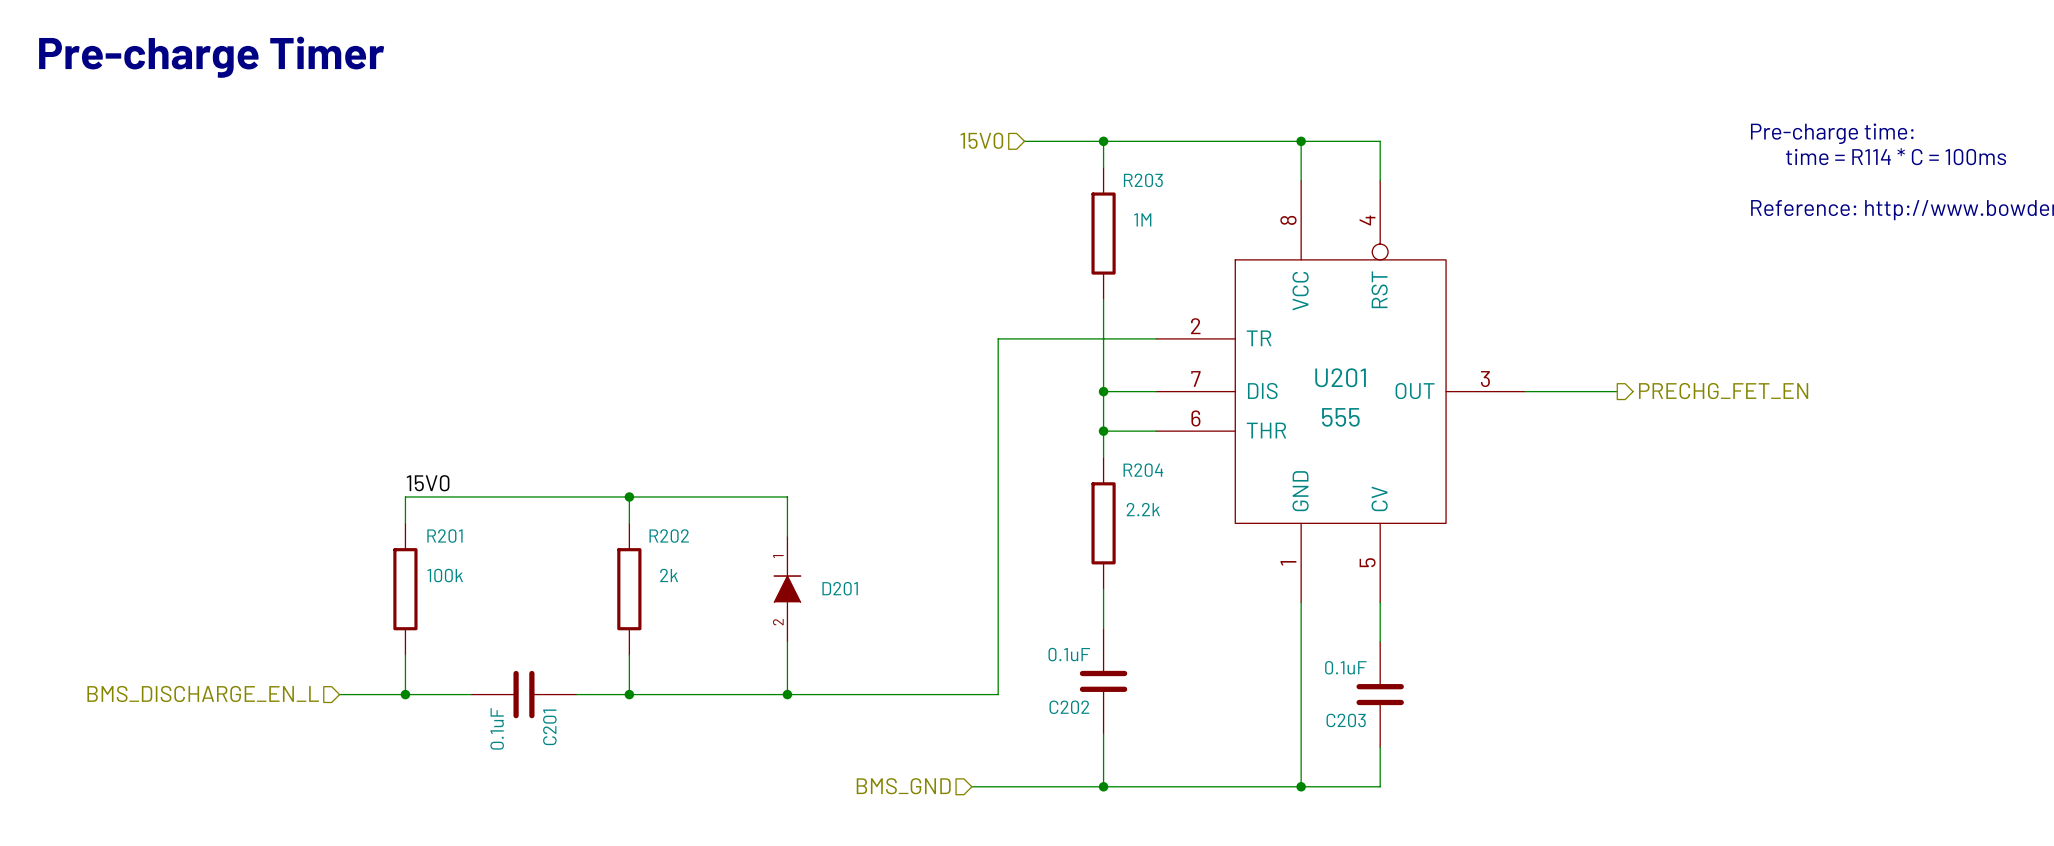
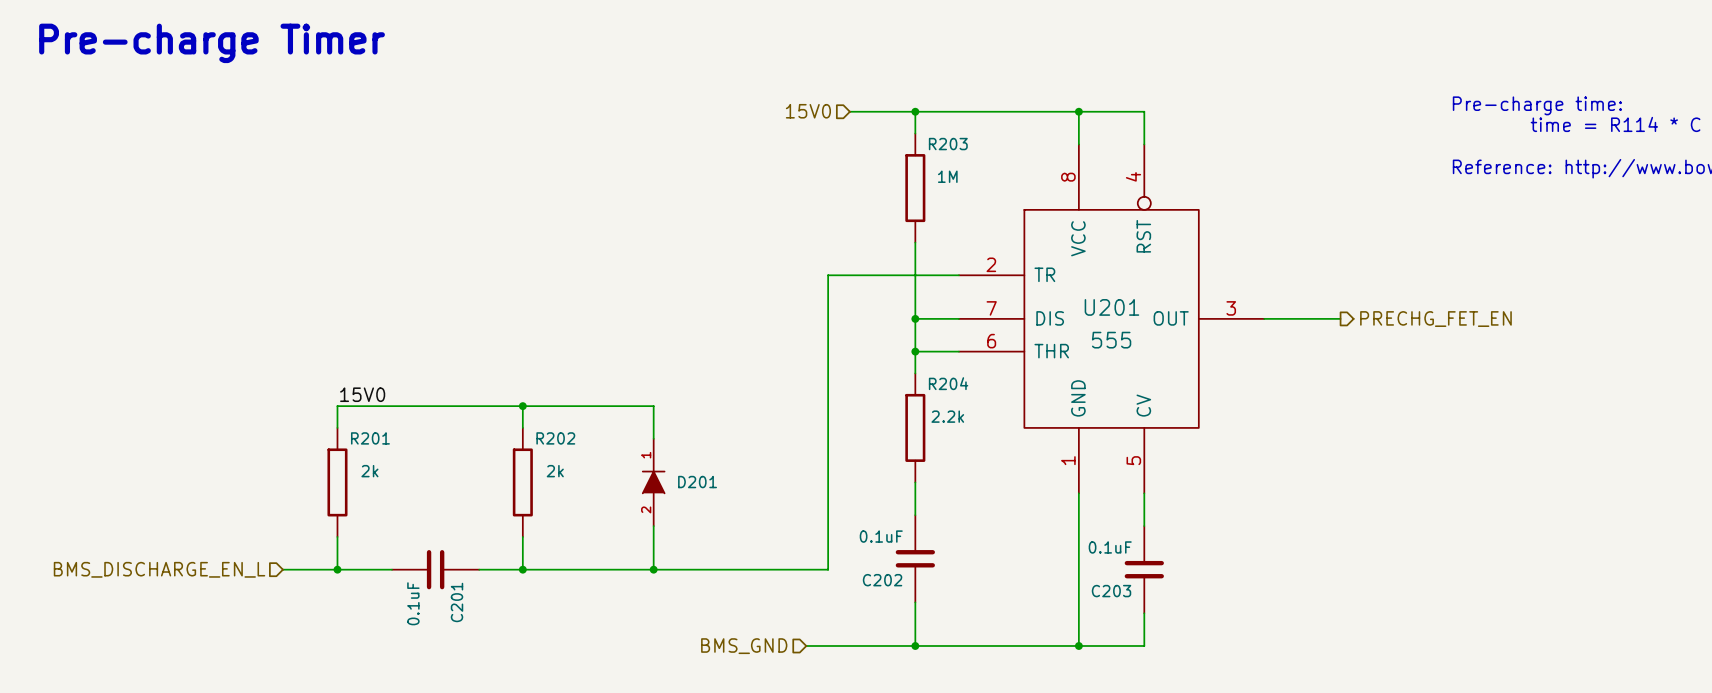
R201 value: 100k (445, 575) -> 2k (369, 471)

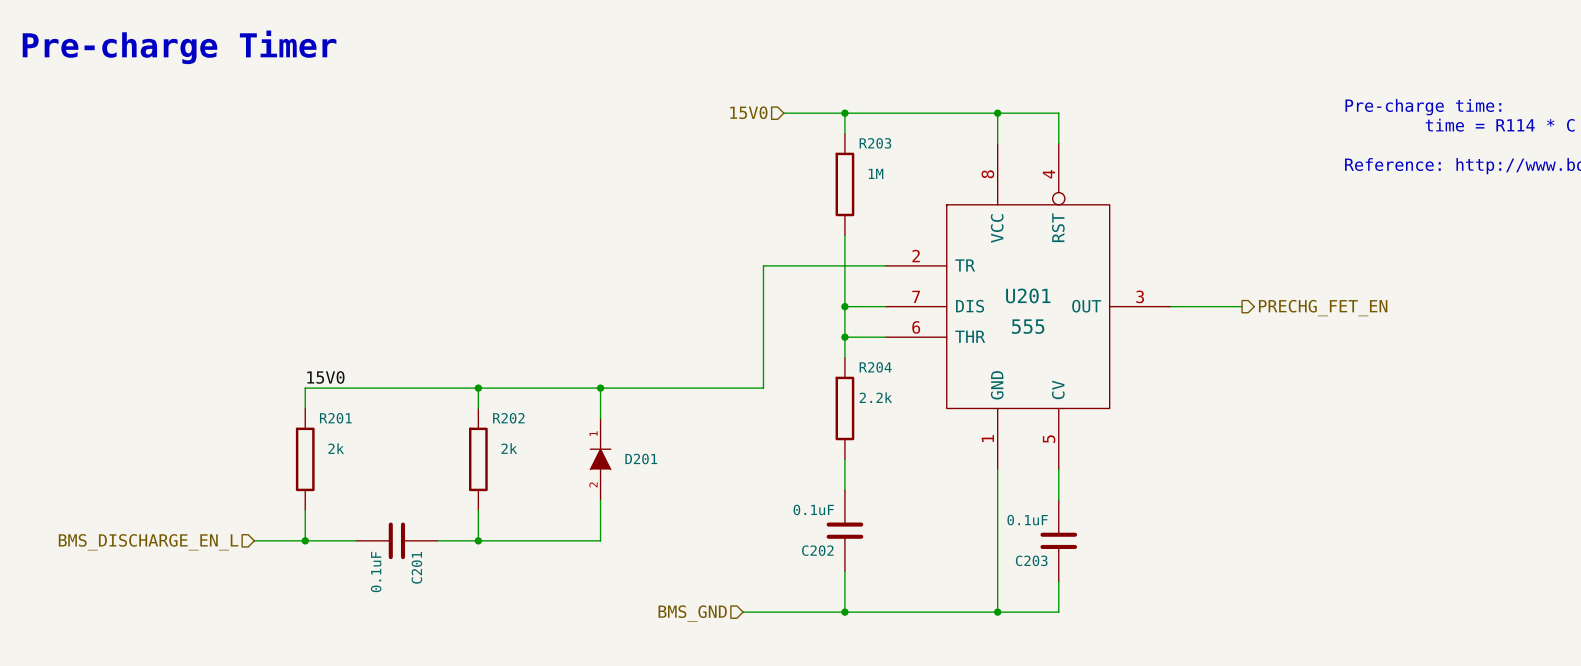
junction: none -> (600, 388)
wire: (828, 406) (828, 569) (653, 569) -> (763, 388) (600, 388)
junction: (653, 569) -> none

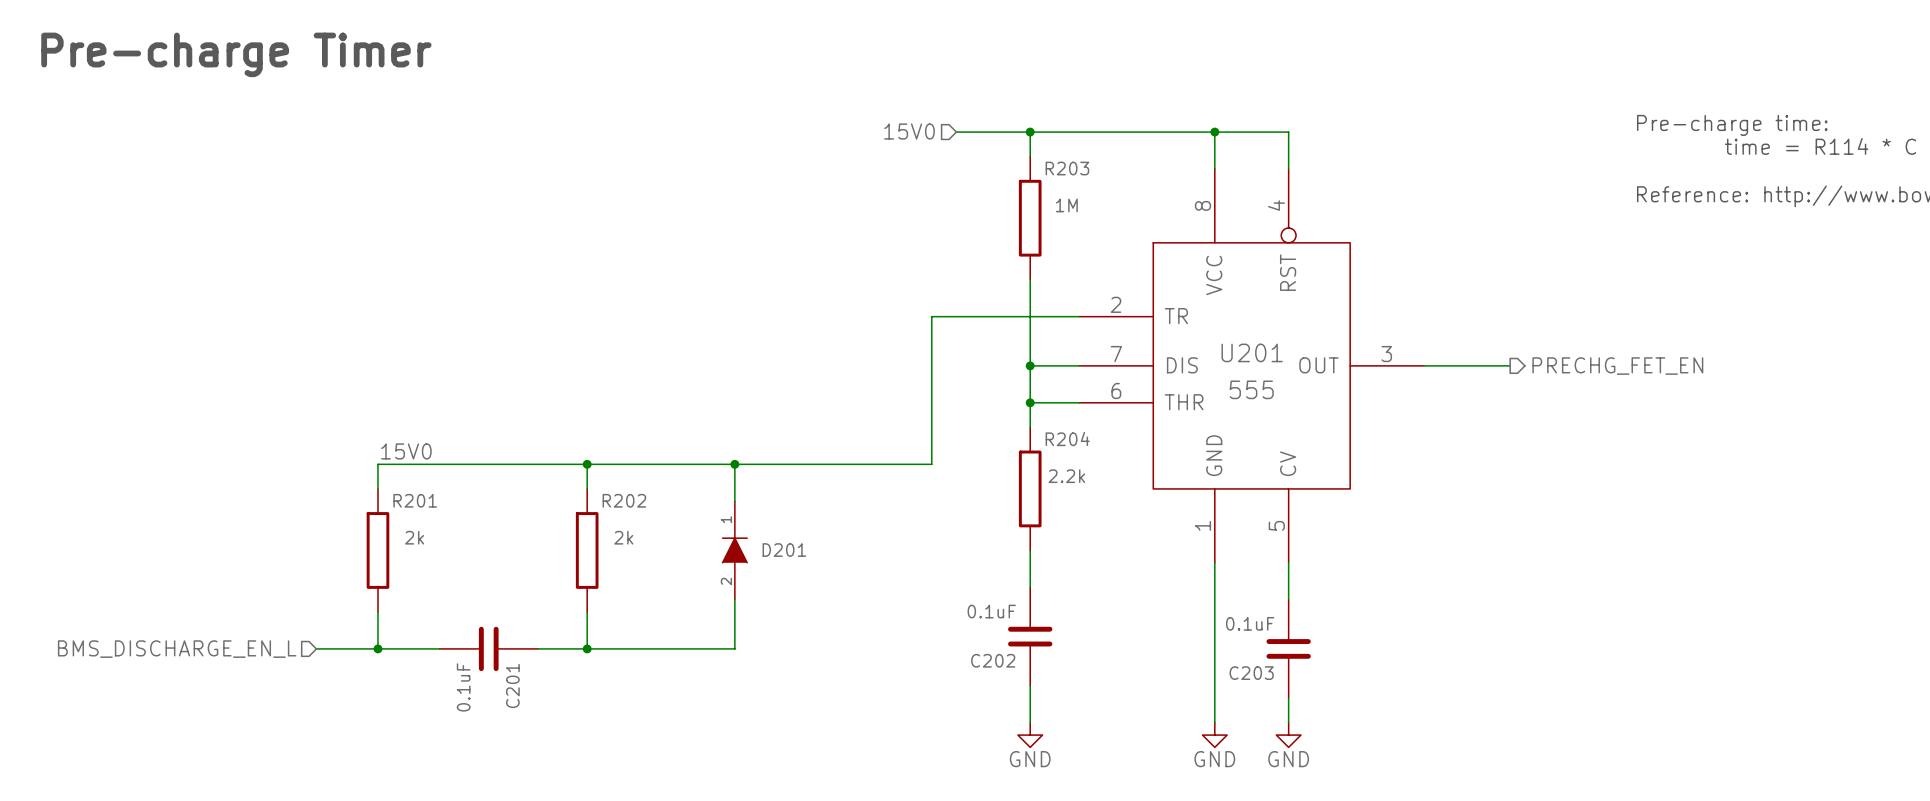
wire: (1058, 601) (1058, 612) (743, 612) -> none
junction: (844, 612) -> none
power symbol: none -> GND (1030, 735)
junction: (997, 612) -> none
power symbol: none -> GND (1214, 735)
power symbol: none -> GND (1288, 735)
hierarchical label: BMS_GND (692, 613) -> none

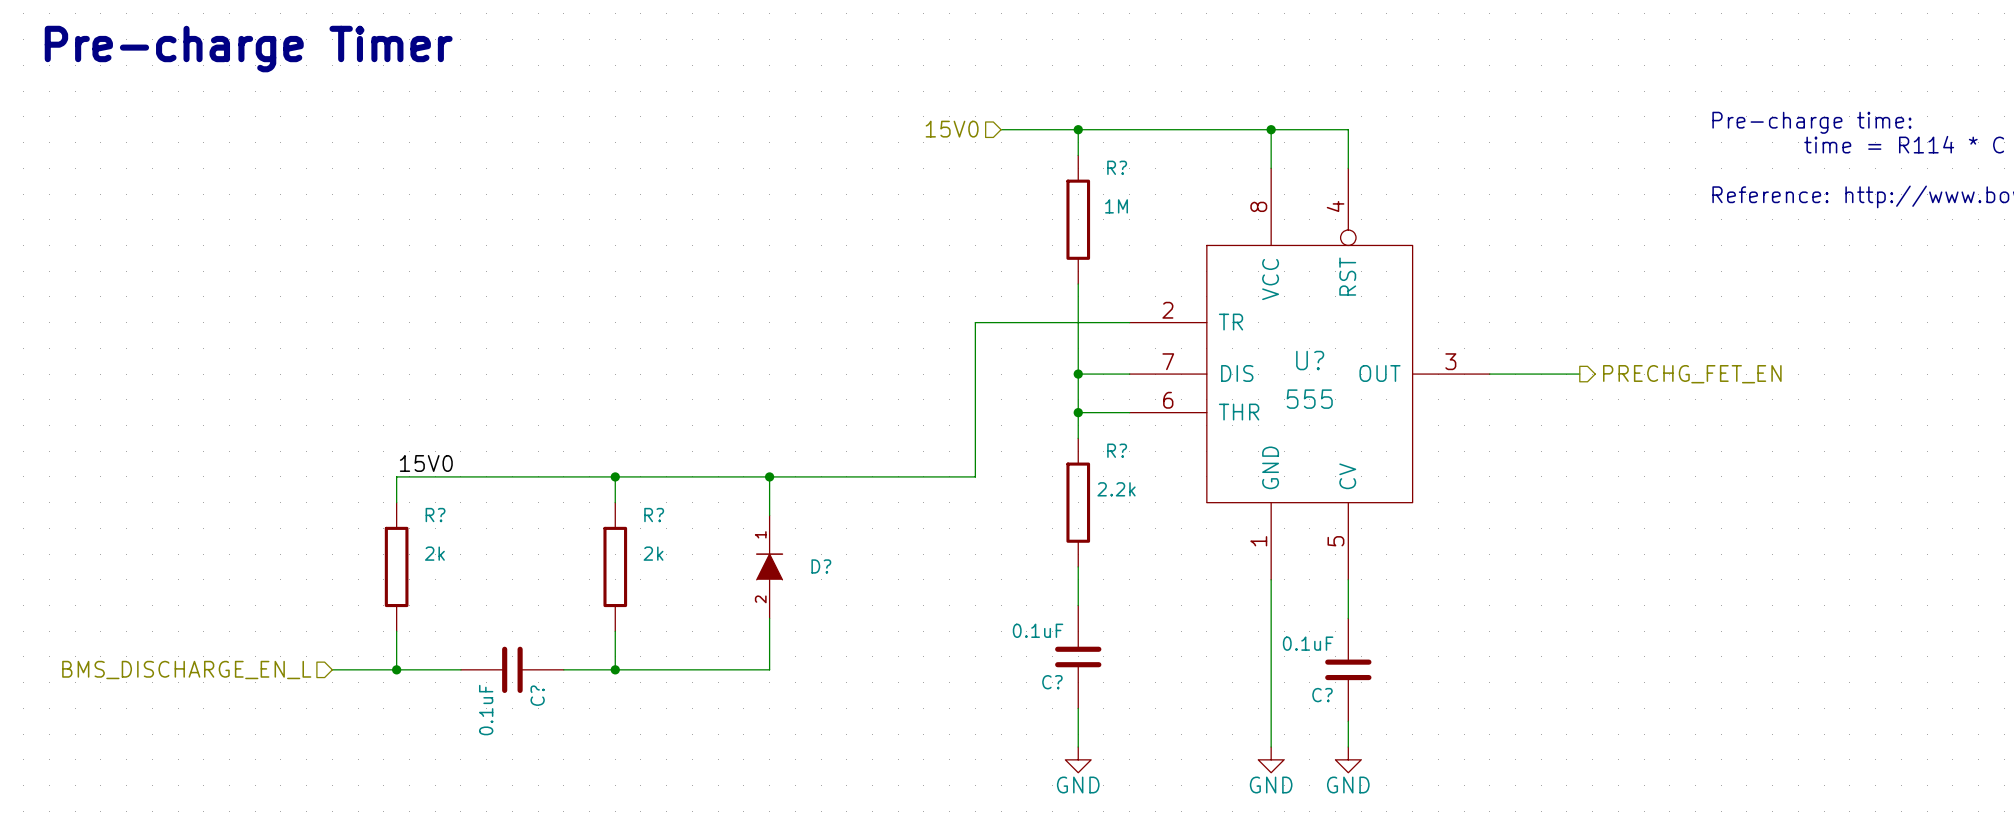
R203 name: R203 (1067, 168) -> R? (1117, 167)
U201 name: U201 (1252, 352) -> U? (1310, 360)
R204 name: R204 (1067, 438) -> R? (1117, 450)
R201 name: R201 (415, 500) -> R? (435, 515)
R202 name: R202 (624, 500) -> R? (654, 515)
D201 name: D201 (784, 550) -> D? (821, 566)
C202 name: C202 (993, 660) -> C? (1052, 682)
C203 name: C203 (1251, 673) -> C? (1322, 695)
C201 name: C201 (512, 685) -> C? (537, 695)

